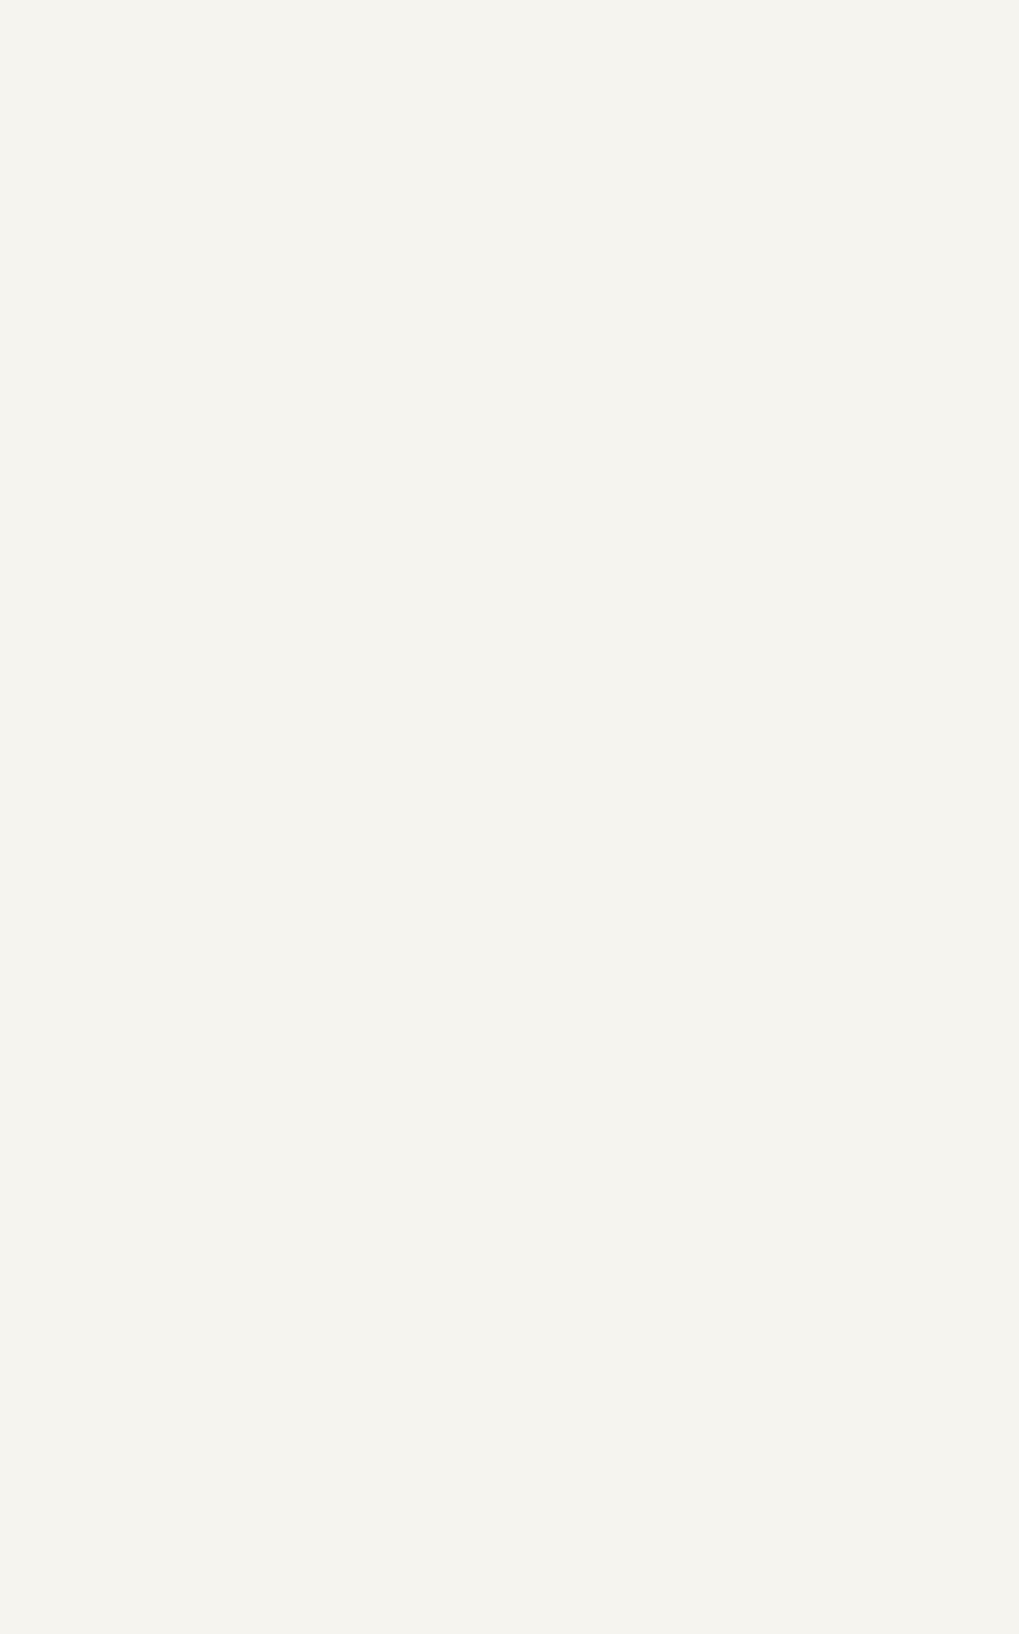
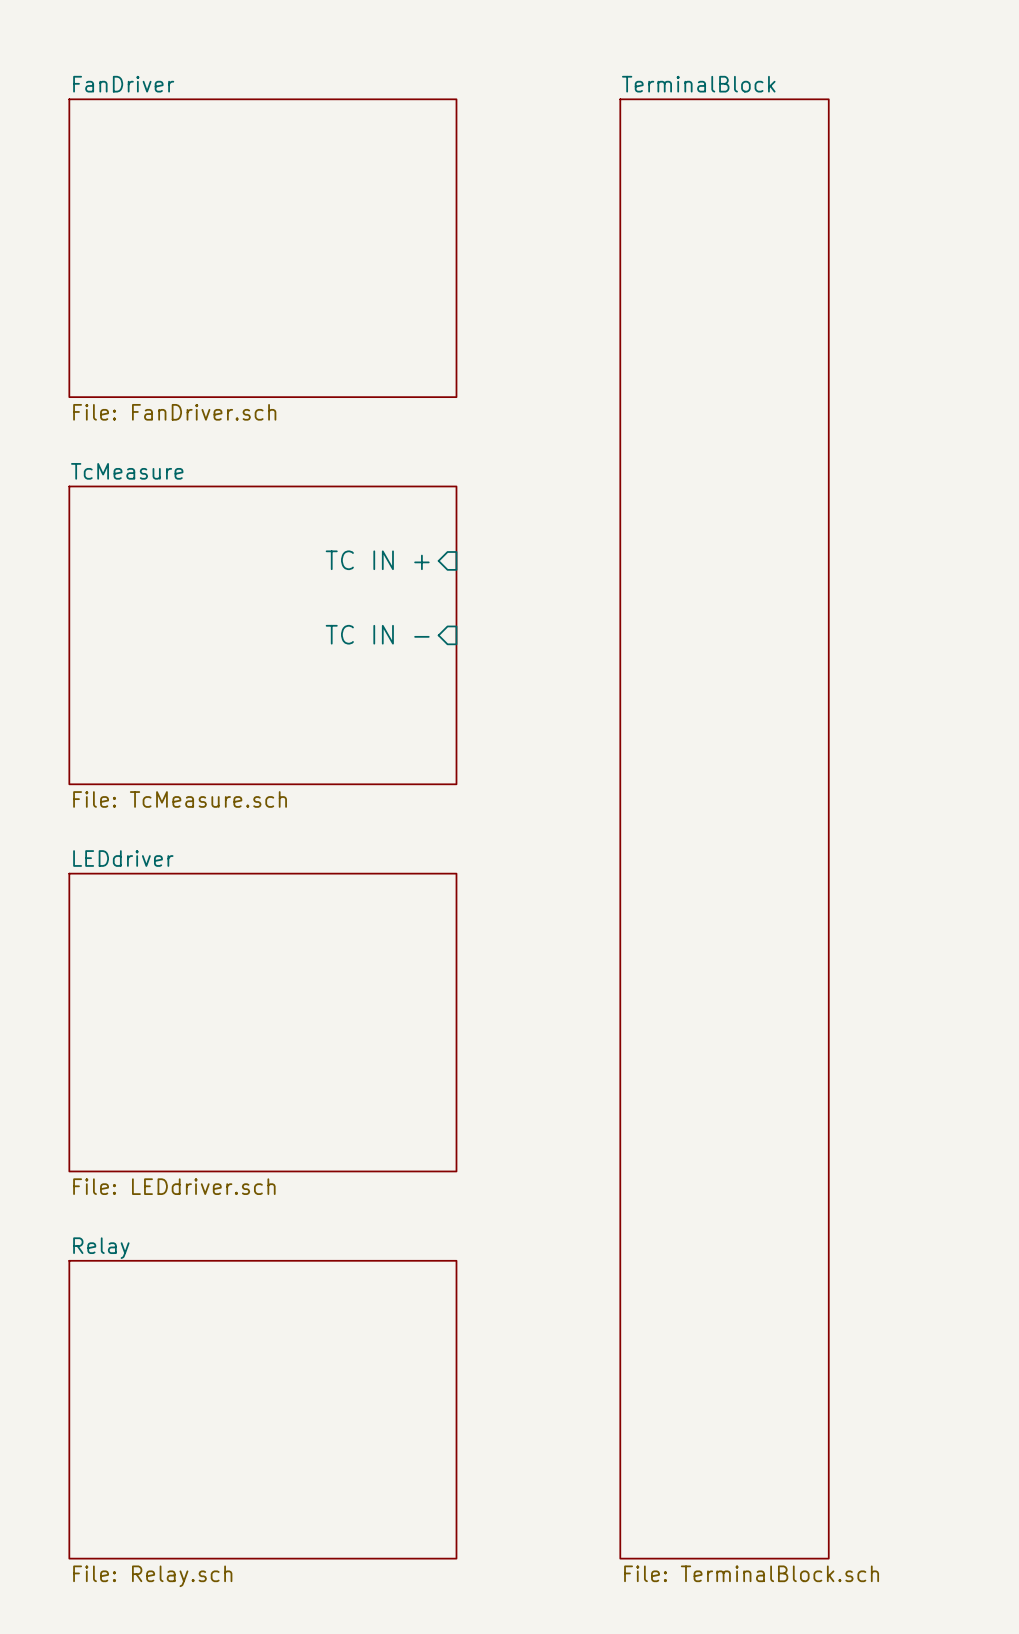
sheet FanDriver: none -> File: FanDriver.sch (262, 248)
sheet pin: none -> TC IN + (377, 560)
sheet pin: none -> TC IN - (377, 634)
sheet TcMeasure: none -> File: TcMeasure.sch (262, 635)
sheet TerminalBlock: none -> File: TerminalBlock.sch (724, 828)
sheet LEDdriver: none -> File: LEDdriver.sch (262, 1022)
sheet Relay: none -> File: Relay.sch (262, 1409)

